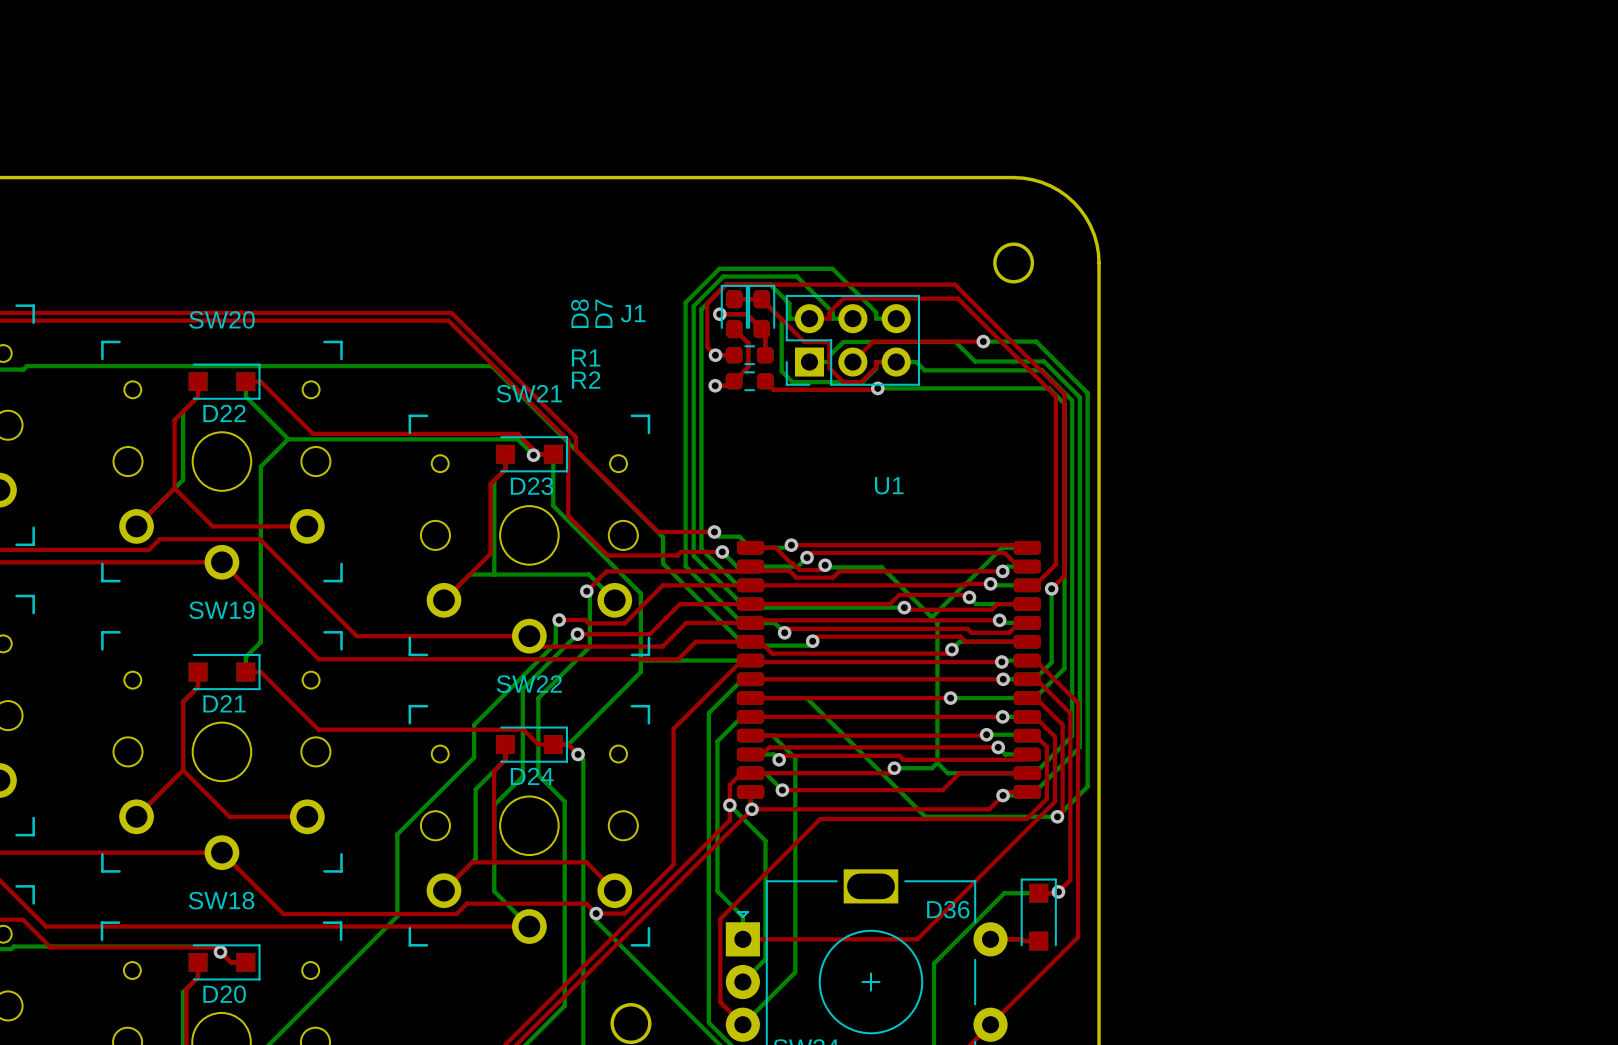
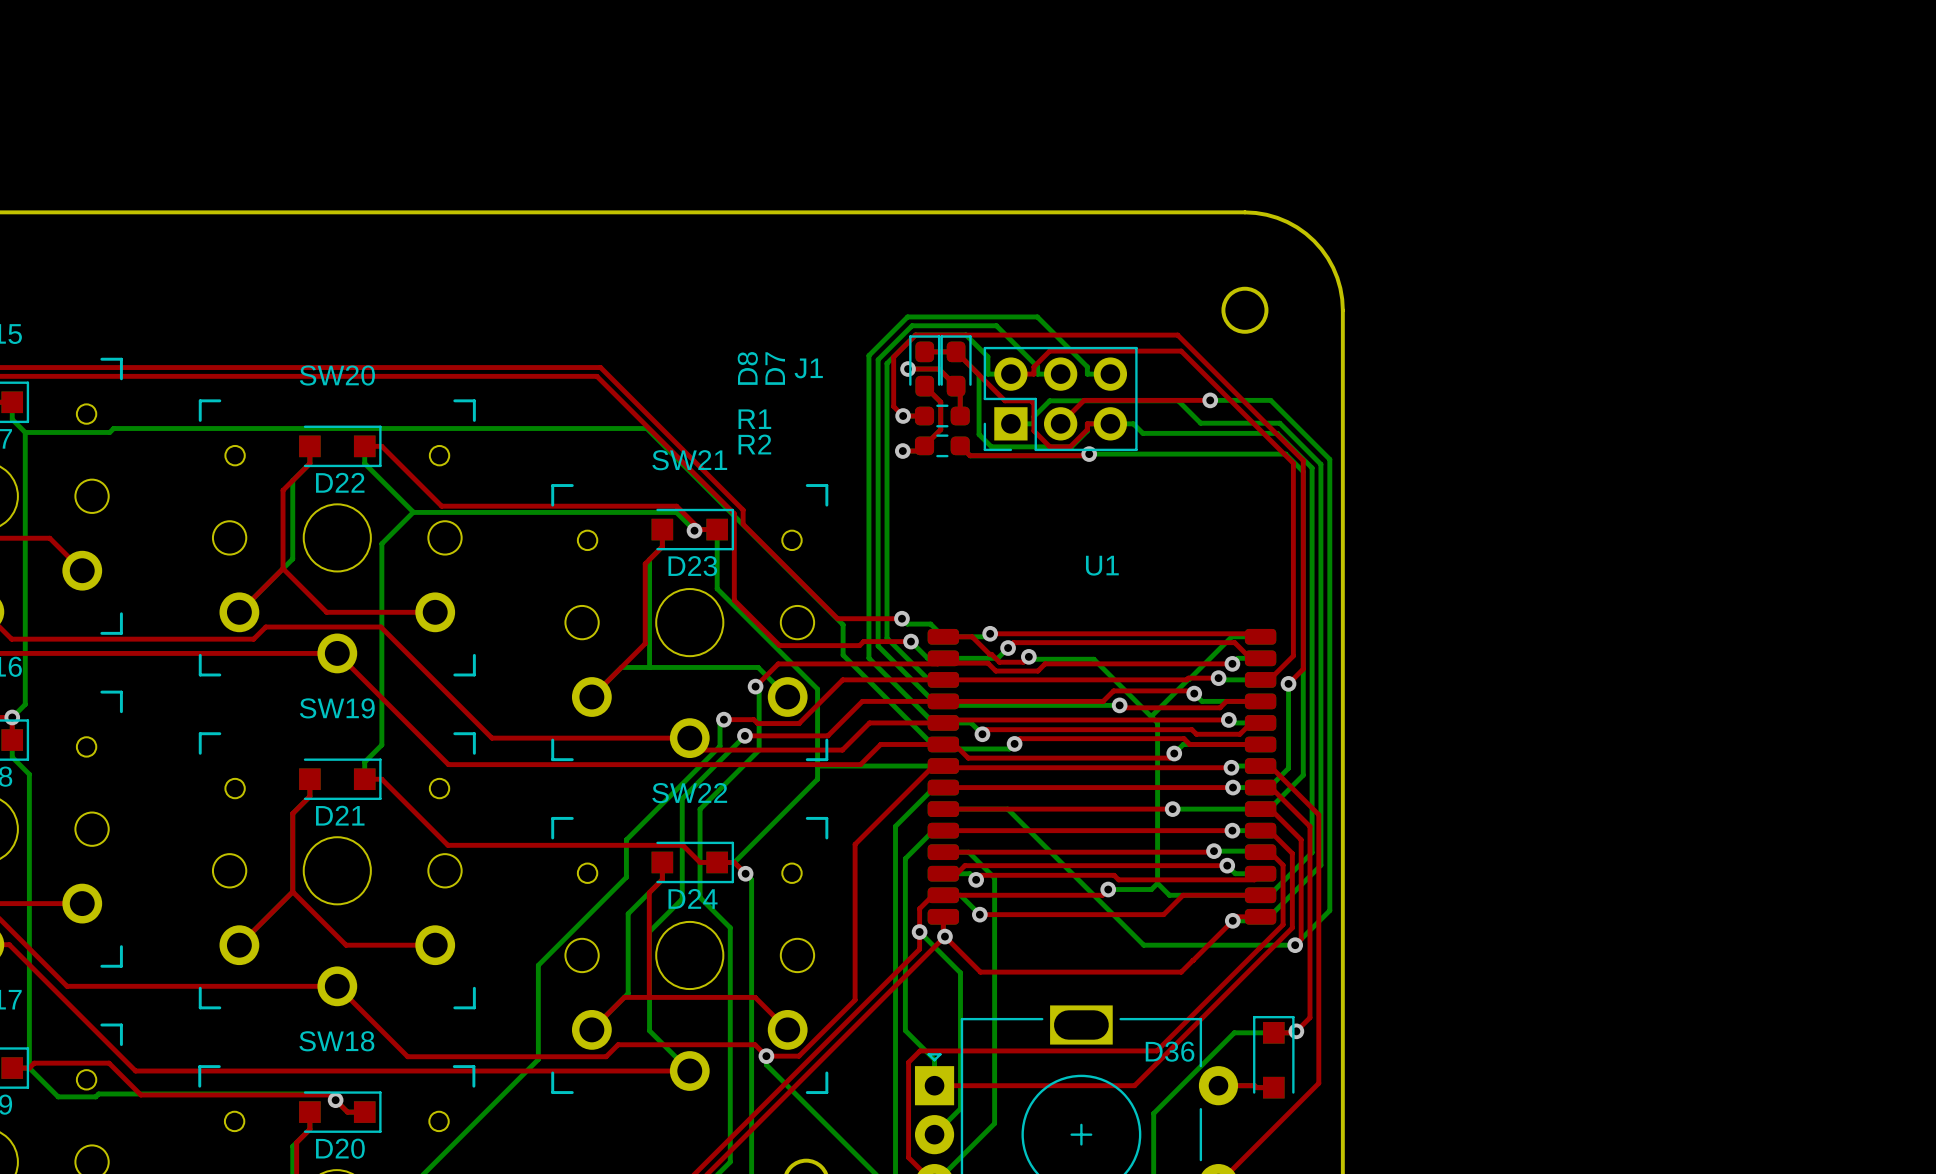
top track: (751, 809) (989, 809) -> (944, 936) (980, 972) (1181, 972) (1193, 960)
top track: none -> (1217, 936) (1193, 960)
top track: (1026, 819) (820, 819) (730, 909) -> (1260, 947) (1156, 1050) (920, 1050)

